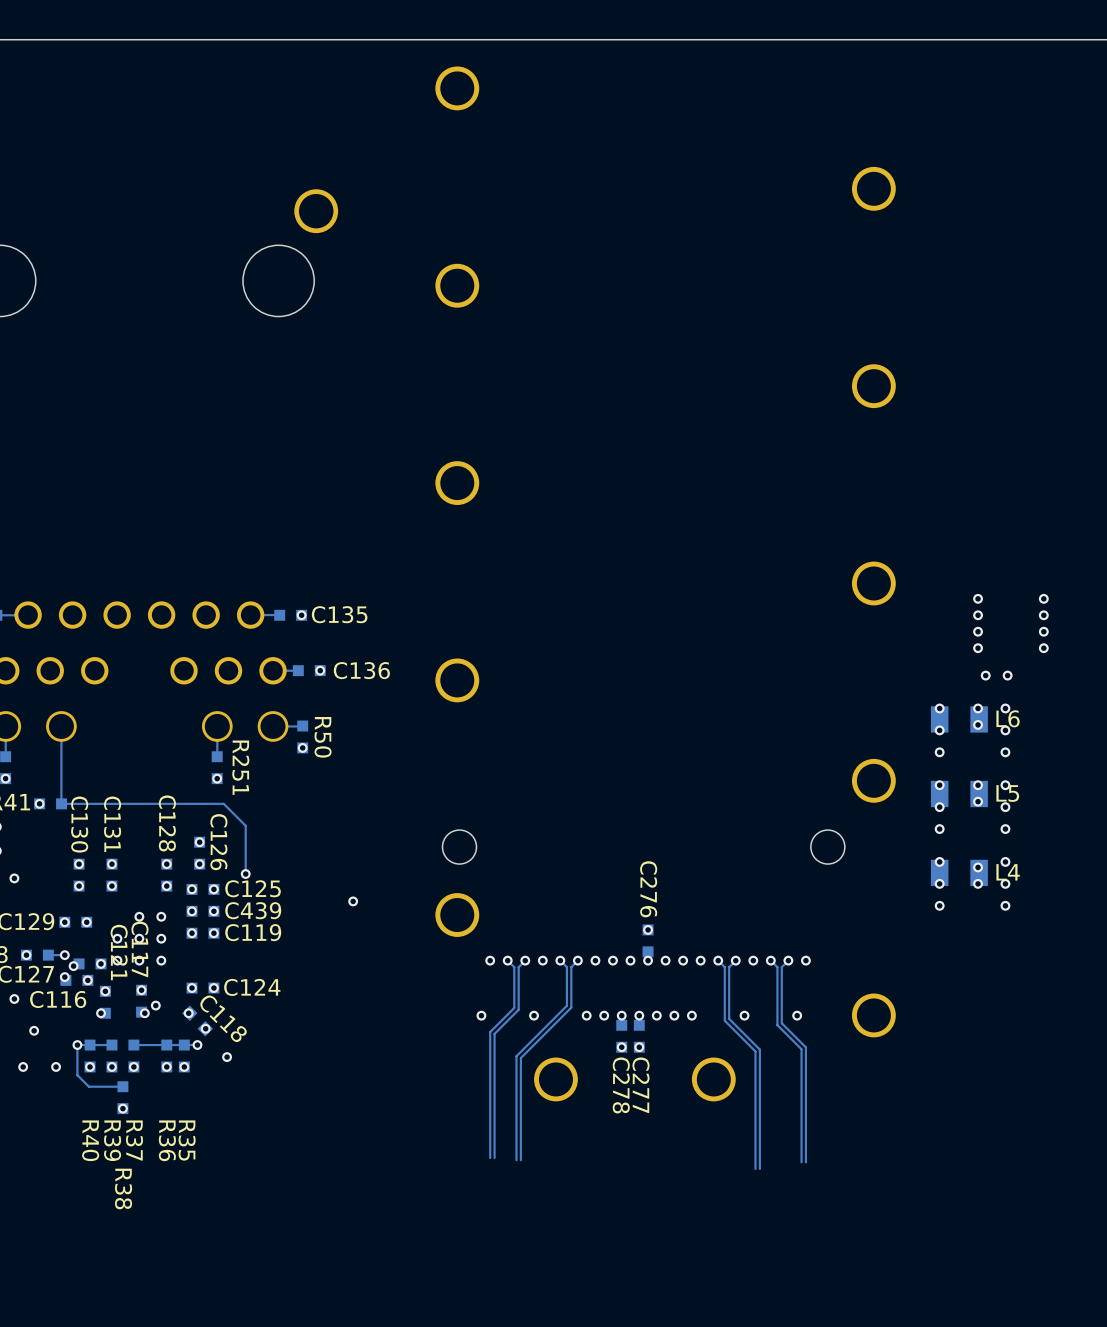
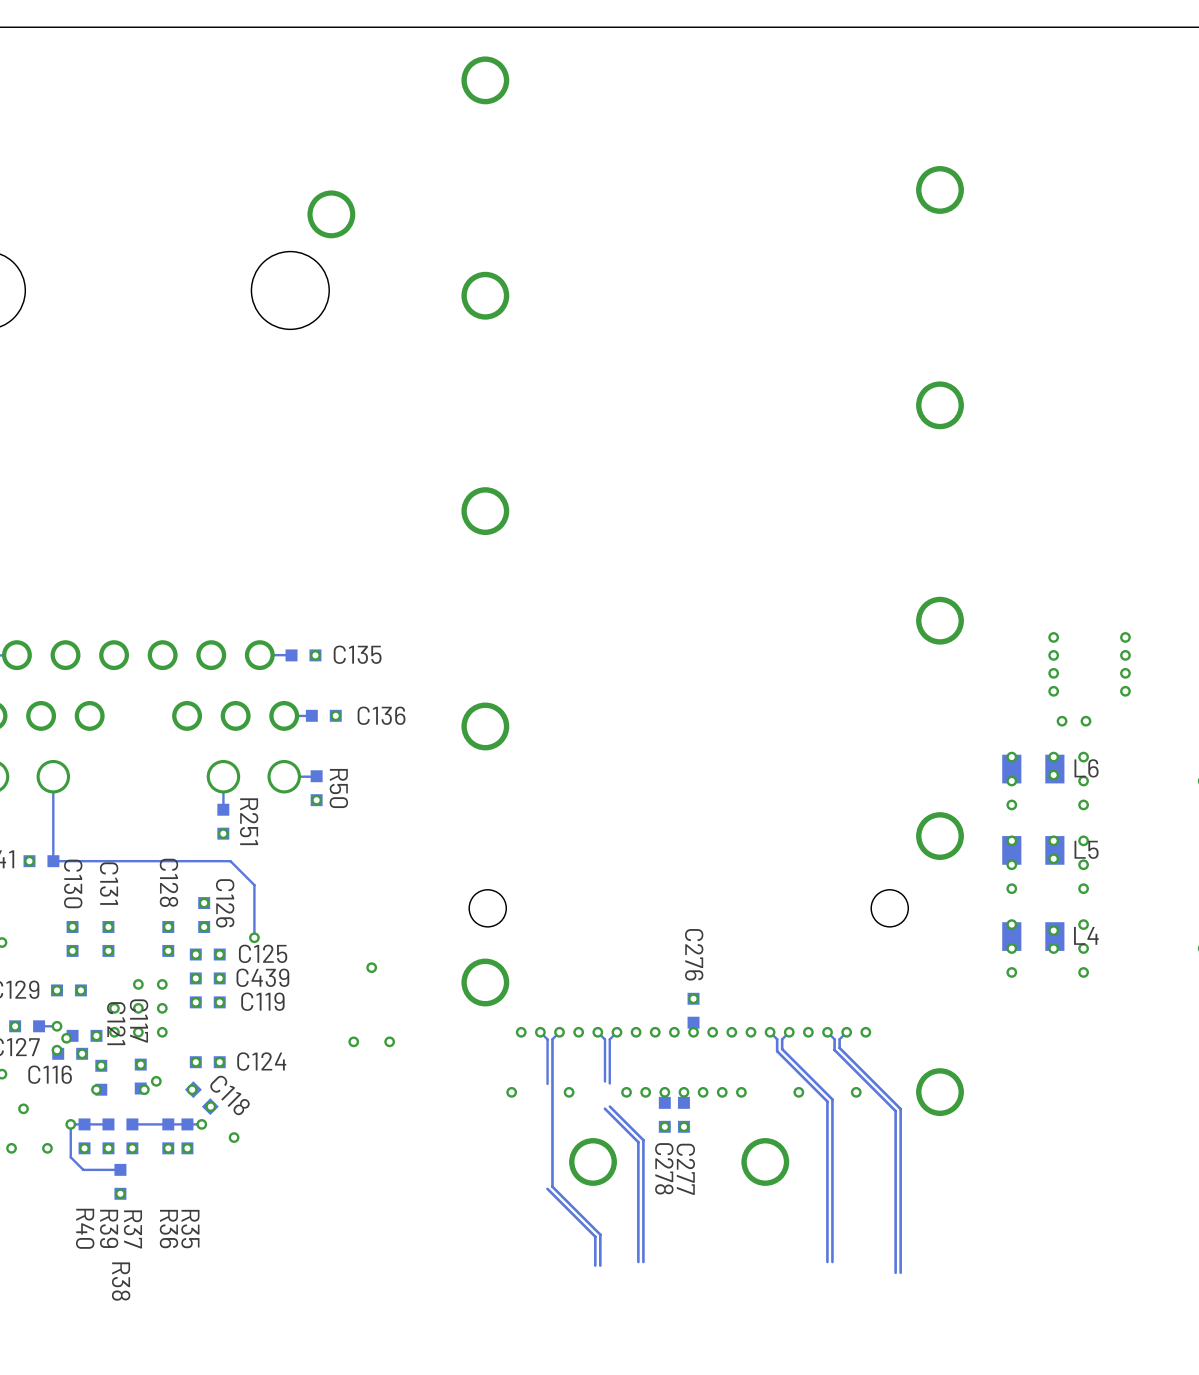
track: (518, 967) (518, 1009) (494, 1033) (494, 1157) -> (552, 1039) (552, 1186) (600, 1234) (600, 1265)
track: (724, 967) (724, 1020) (755, 1051) (755, 1168) -> (777, 1039) (777, 1051) (827, 1101) (827, 1262)
track: (729, 967) (729, 1018) (759, 1049) (759, 1168) -> (782, 1039) (782, 1049) (832, 1099) (832, 1262)
track: (777, 967) (777, 1025) (801, 1049) (801, 1162) -> (834, 1039) (834, 1050) (895, 1111) (895, 1272)
track: (781, 967) (781, 1023) (805, 1047) (805, 1162) -> (839, 1039) (839, 1047) (900, 1109) (900, 1272)
via: none -> (353, 1041)
via: none -> (389, 1041)
track: (566, 1005) (516, 1056) (516, 1160) -> none
track: (514, 1007) (490, 1032) (490, 1157) -> none
track: (571, 1007) (520, 1058) (520, 1160) -> none
track: none -> (609, 1106) (643, 1140) (643, 1262)
track: none -> (604, 1108) (638, 1142) (638, 1262)
track: none -> (547, 1188) (595, 1236) (595, 1265)

